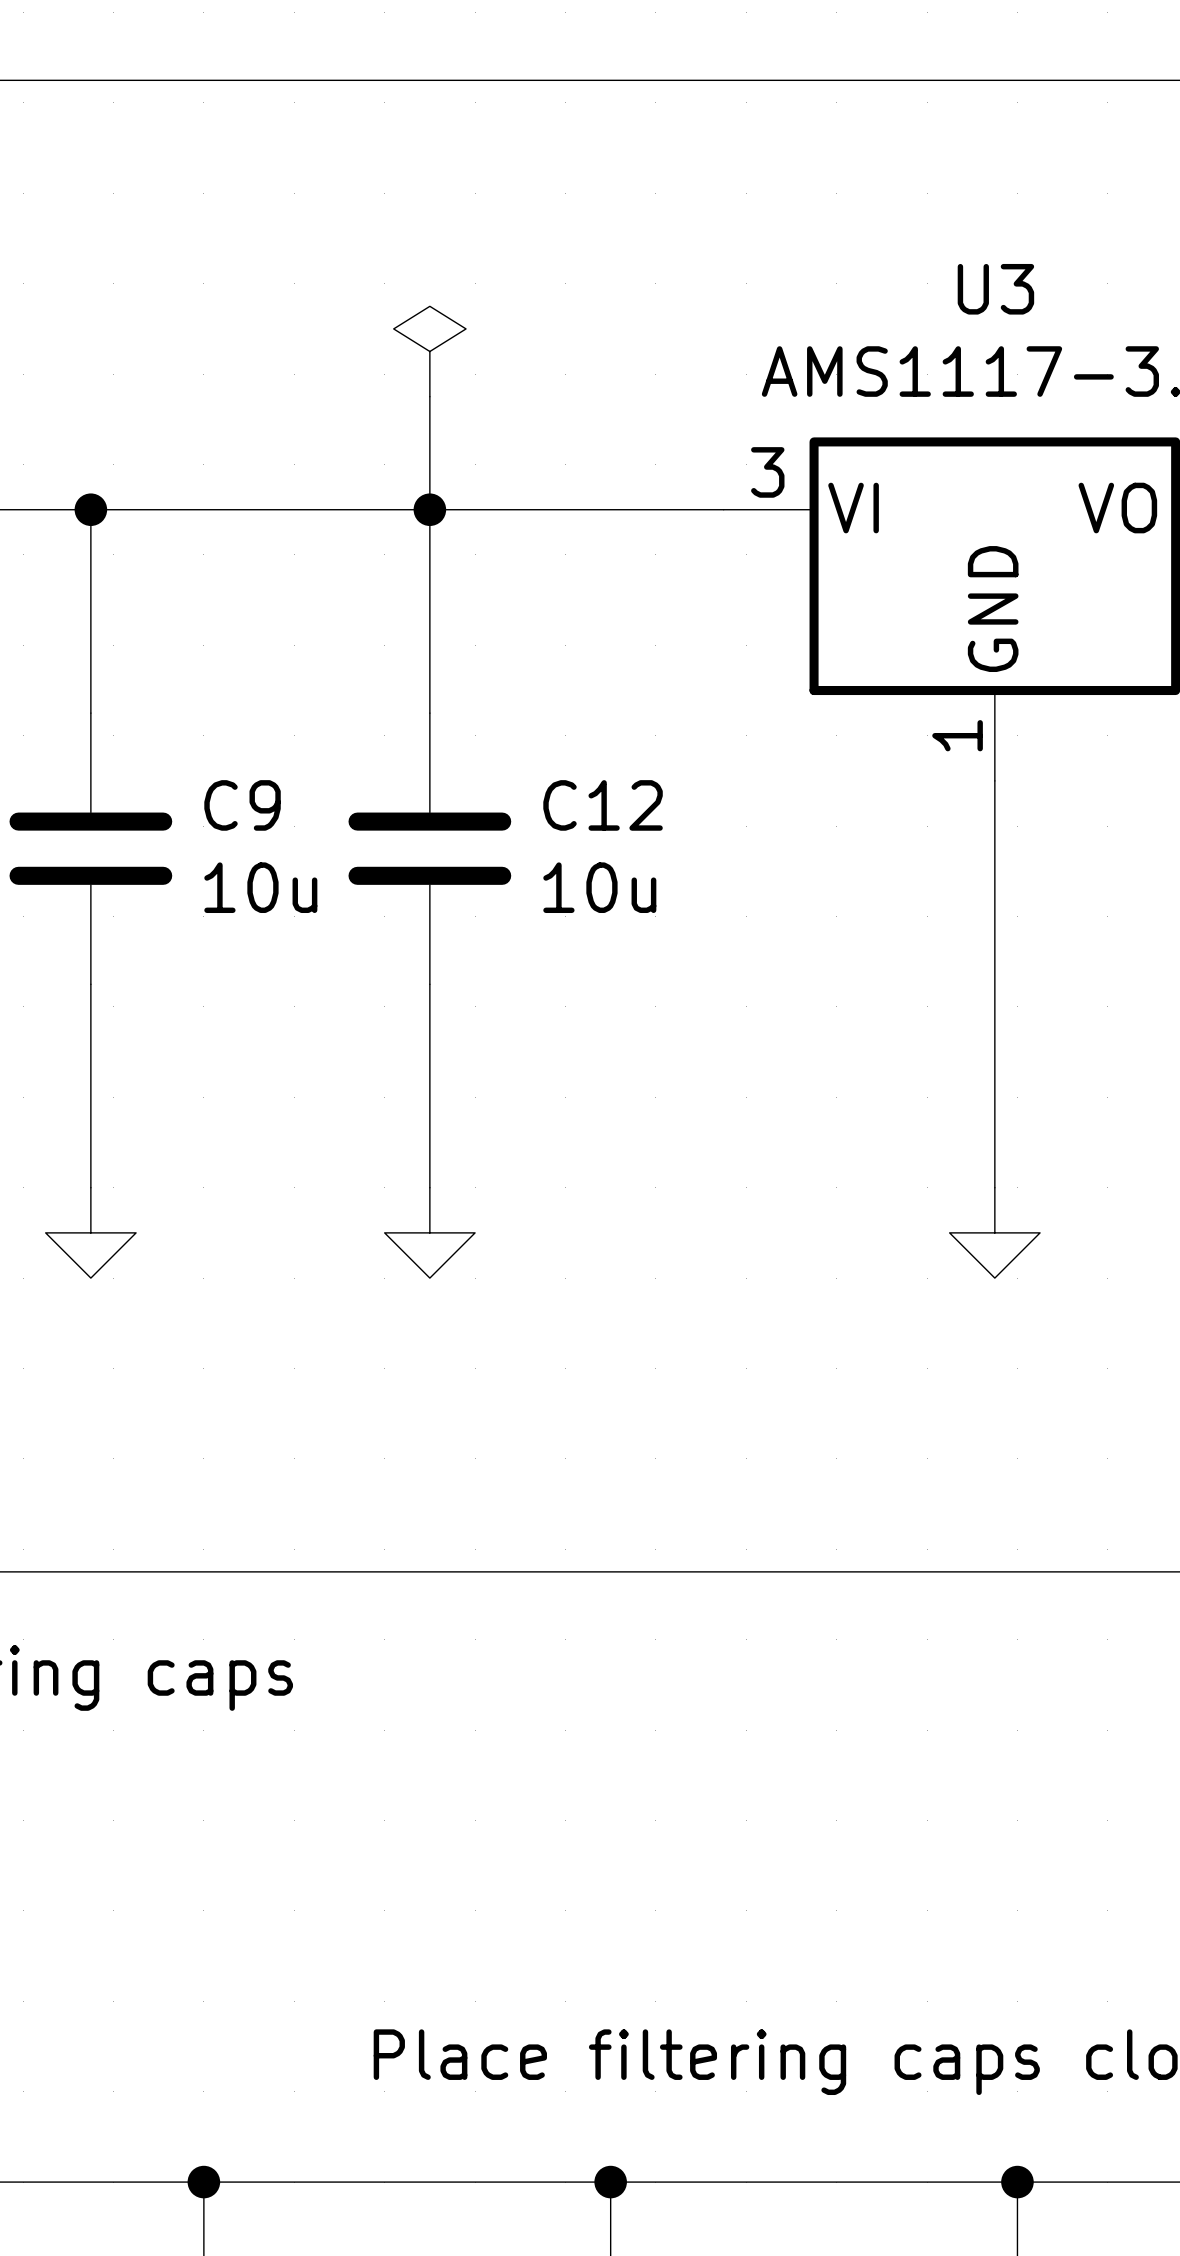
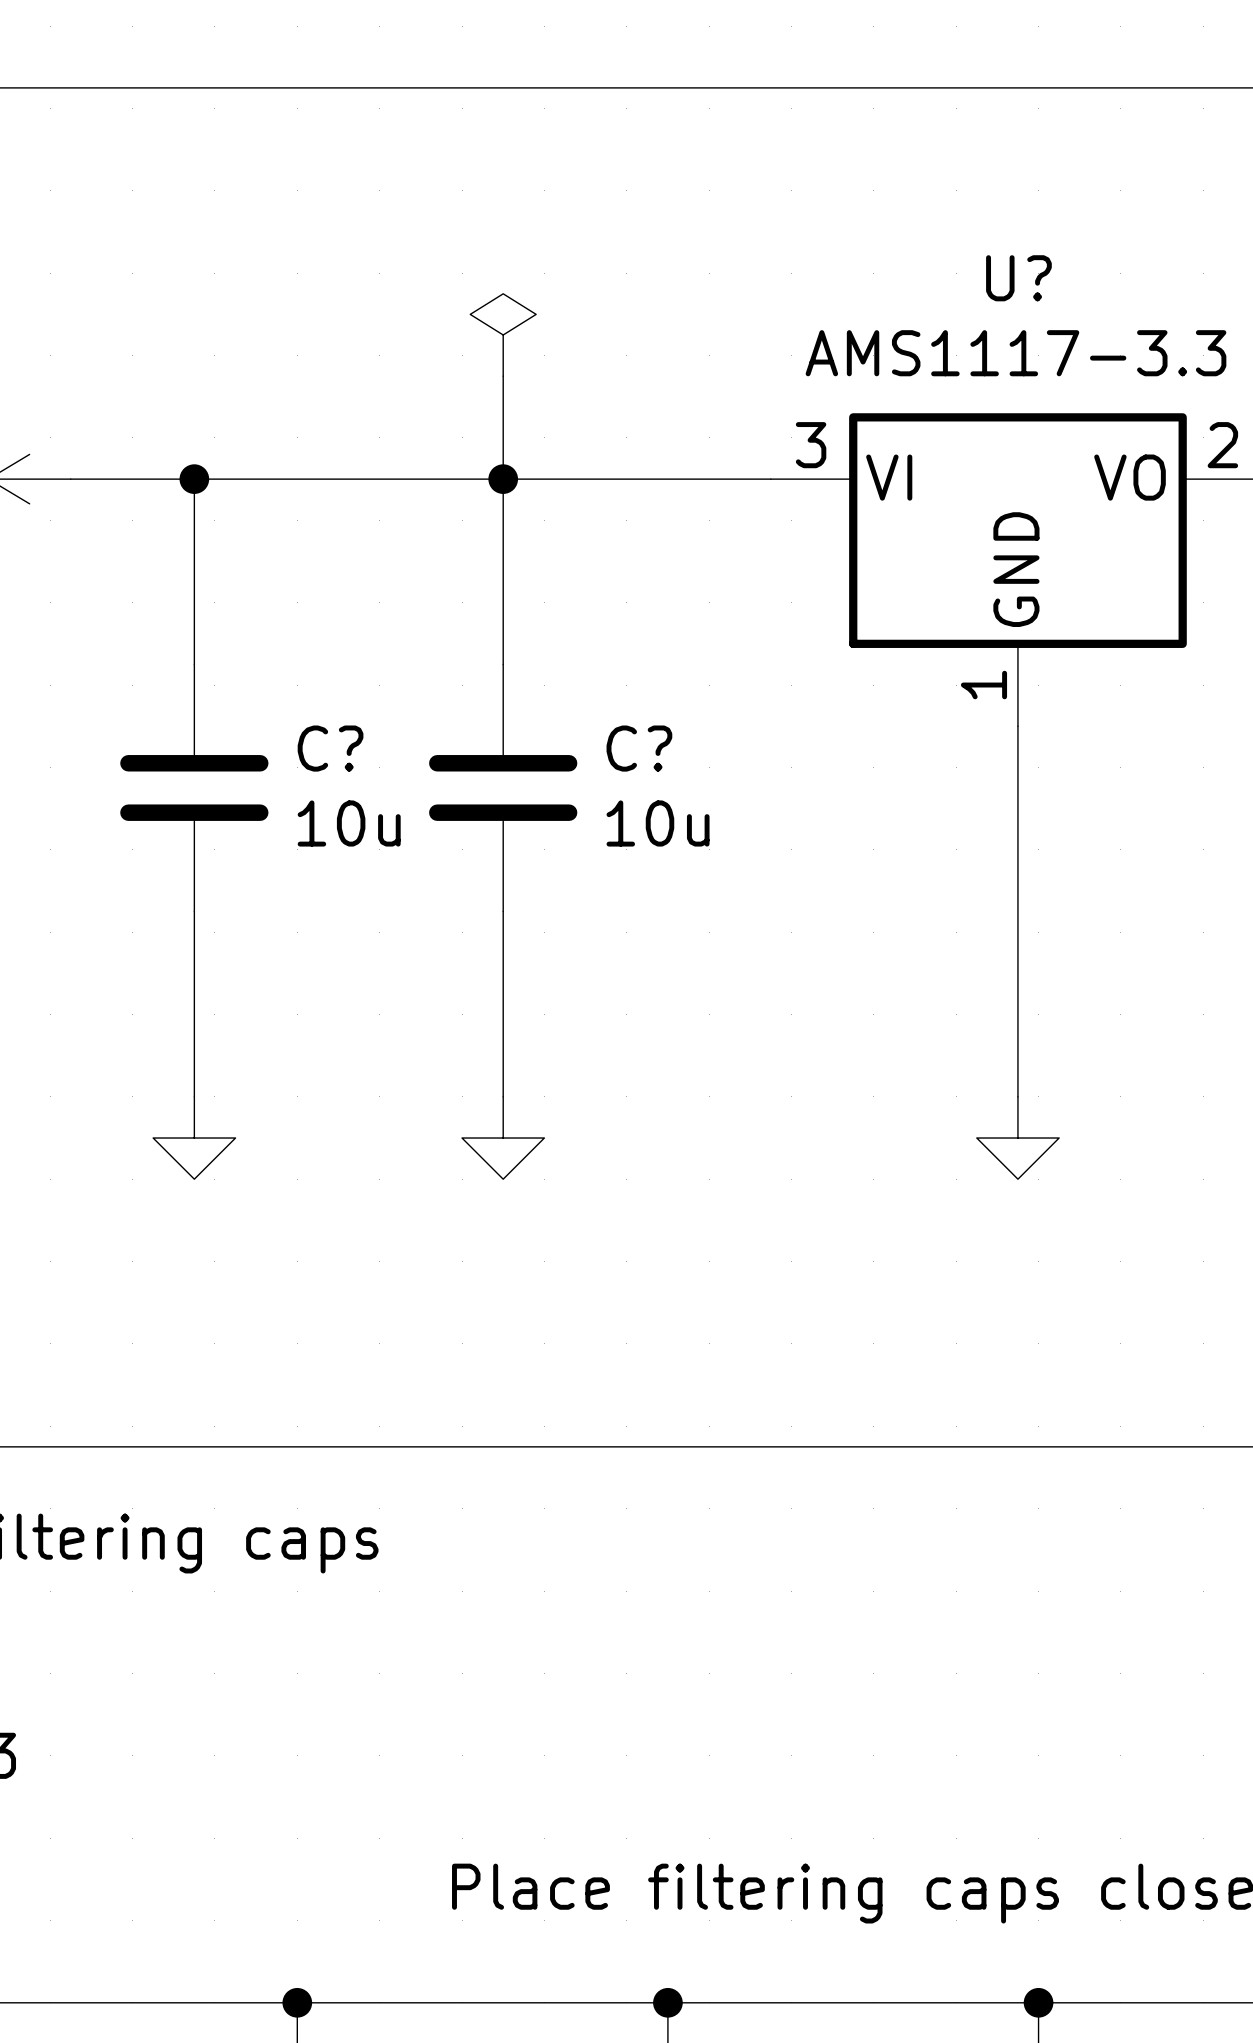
U3 name: U3 (995, 289) -> U? (1018, 278)
C9 name: C9 (242, 805) -> C? (330, 748)
C12 name: C12 (603, 805) -> C? (639, 748)

